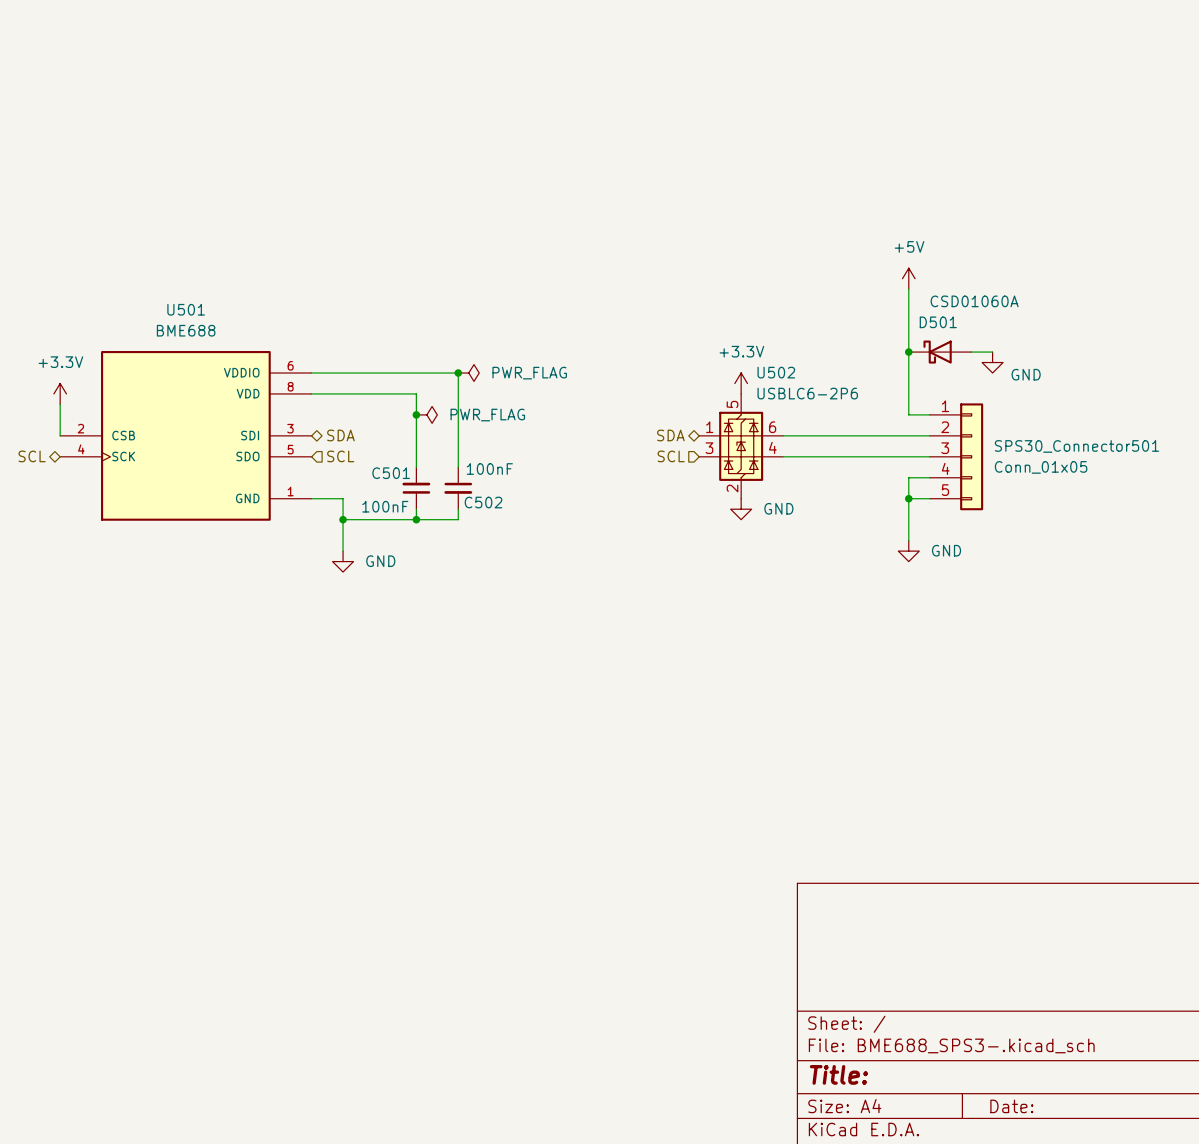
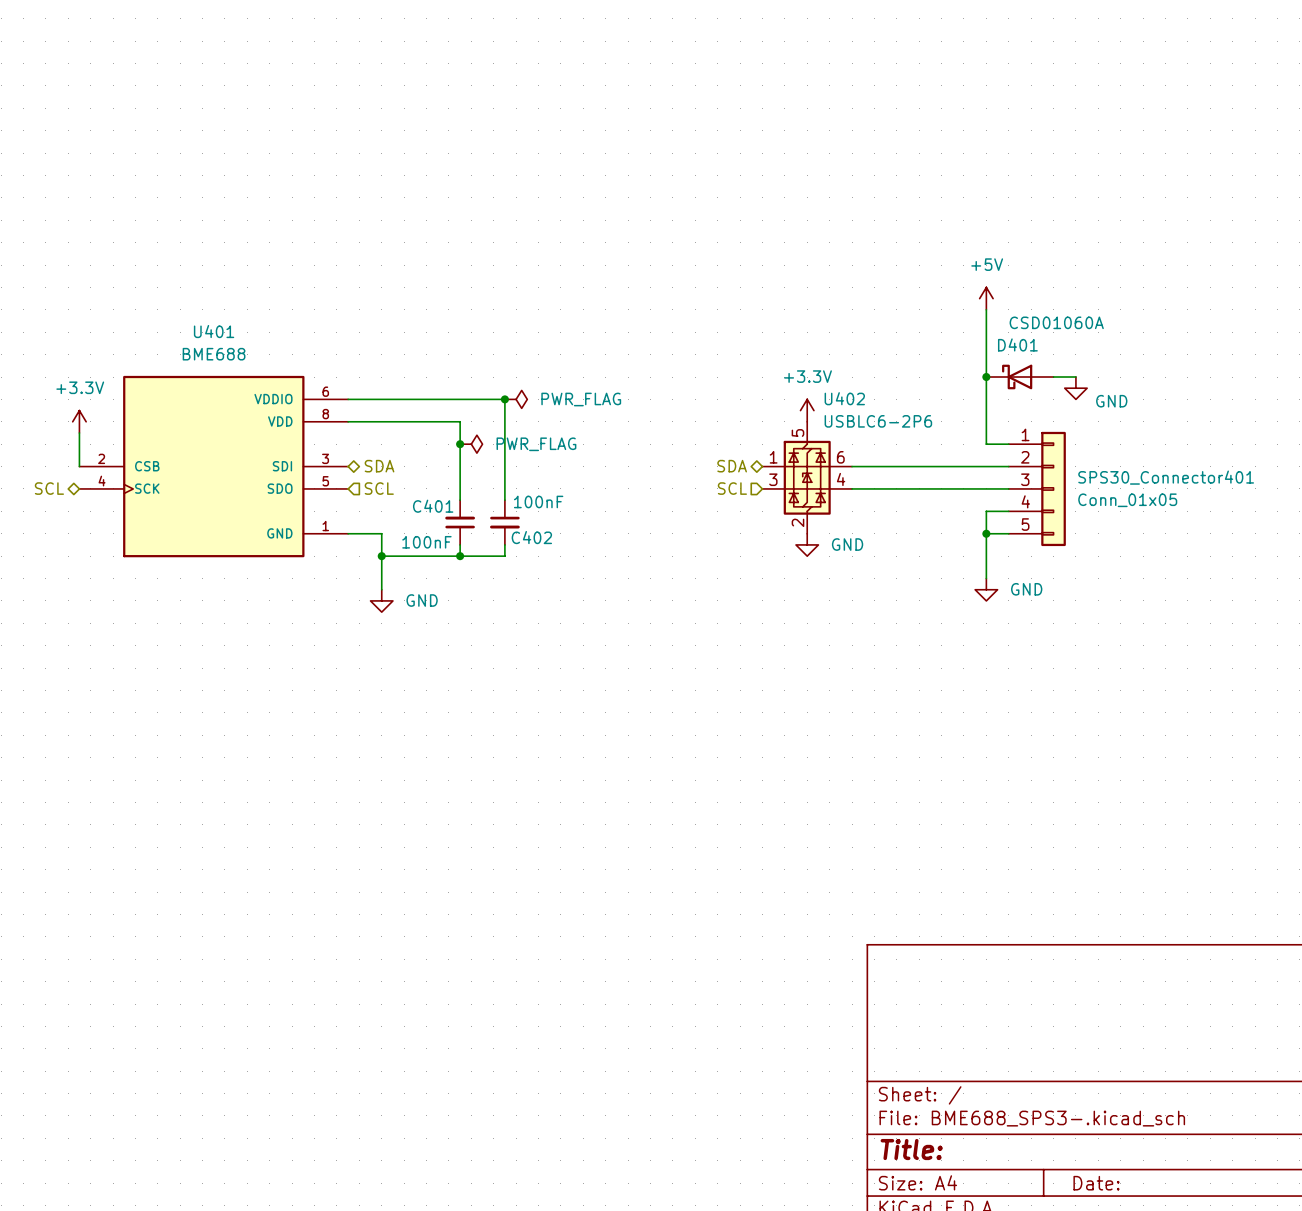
U501 name: U501 (186, 309) -> U401 (214, 331)
D501 name: D501 (938, 322) -> D401 (1017, 344)
U502 name: U502 (776, 372) -> U402 (844, 398)
SPS30_Connector501 name: SPS30_Connector501 (1076, 446) -> SPS30_Connector401 (1166, 477)
C501 name: C501 (391, 473) -> C401 (433, 506)
C502 name: C502 (483, 502) -> C402 (531, 537)

